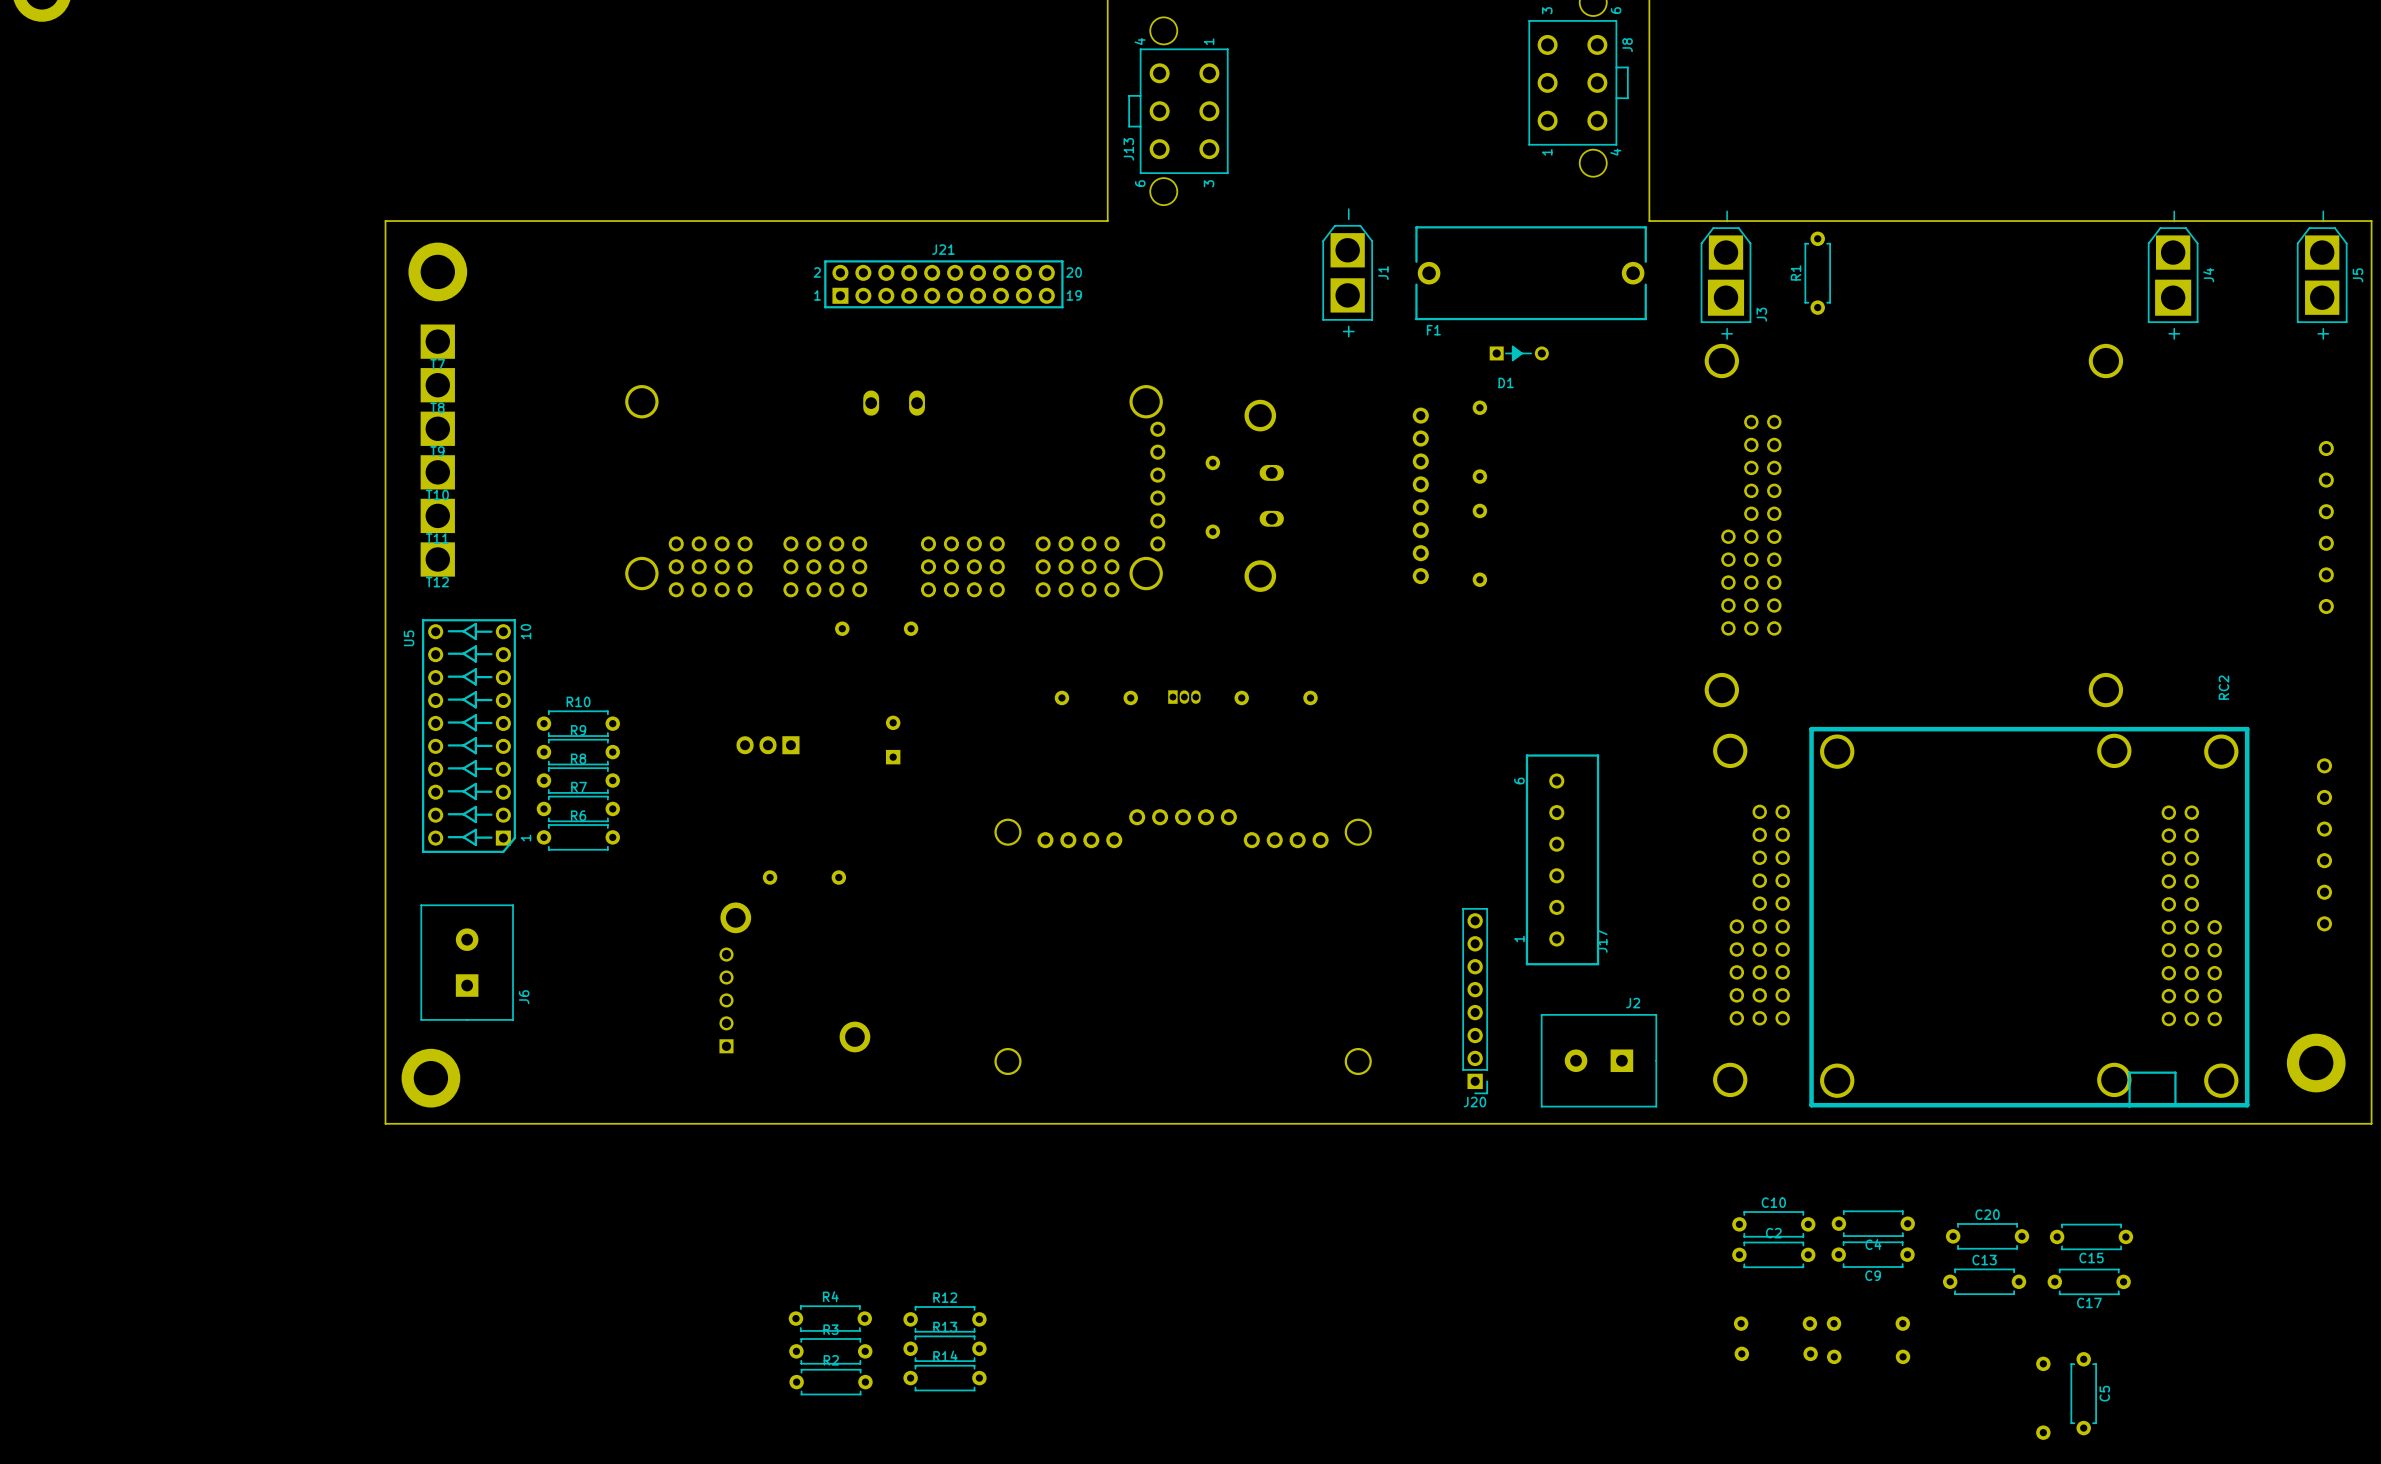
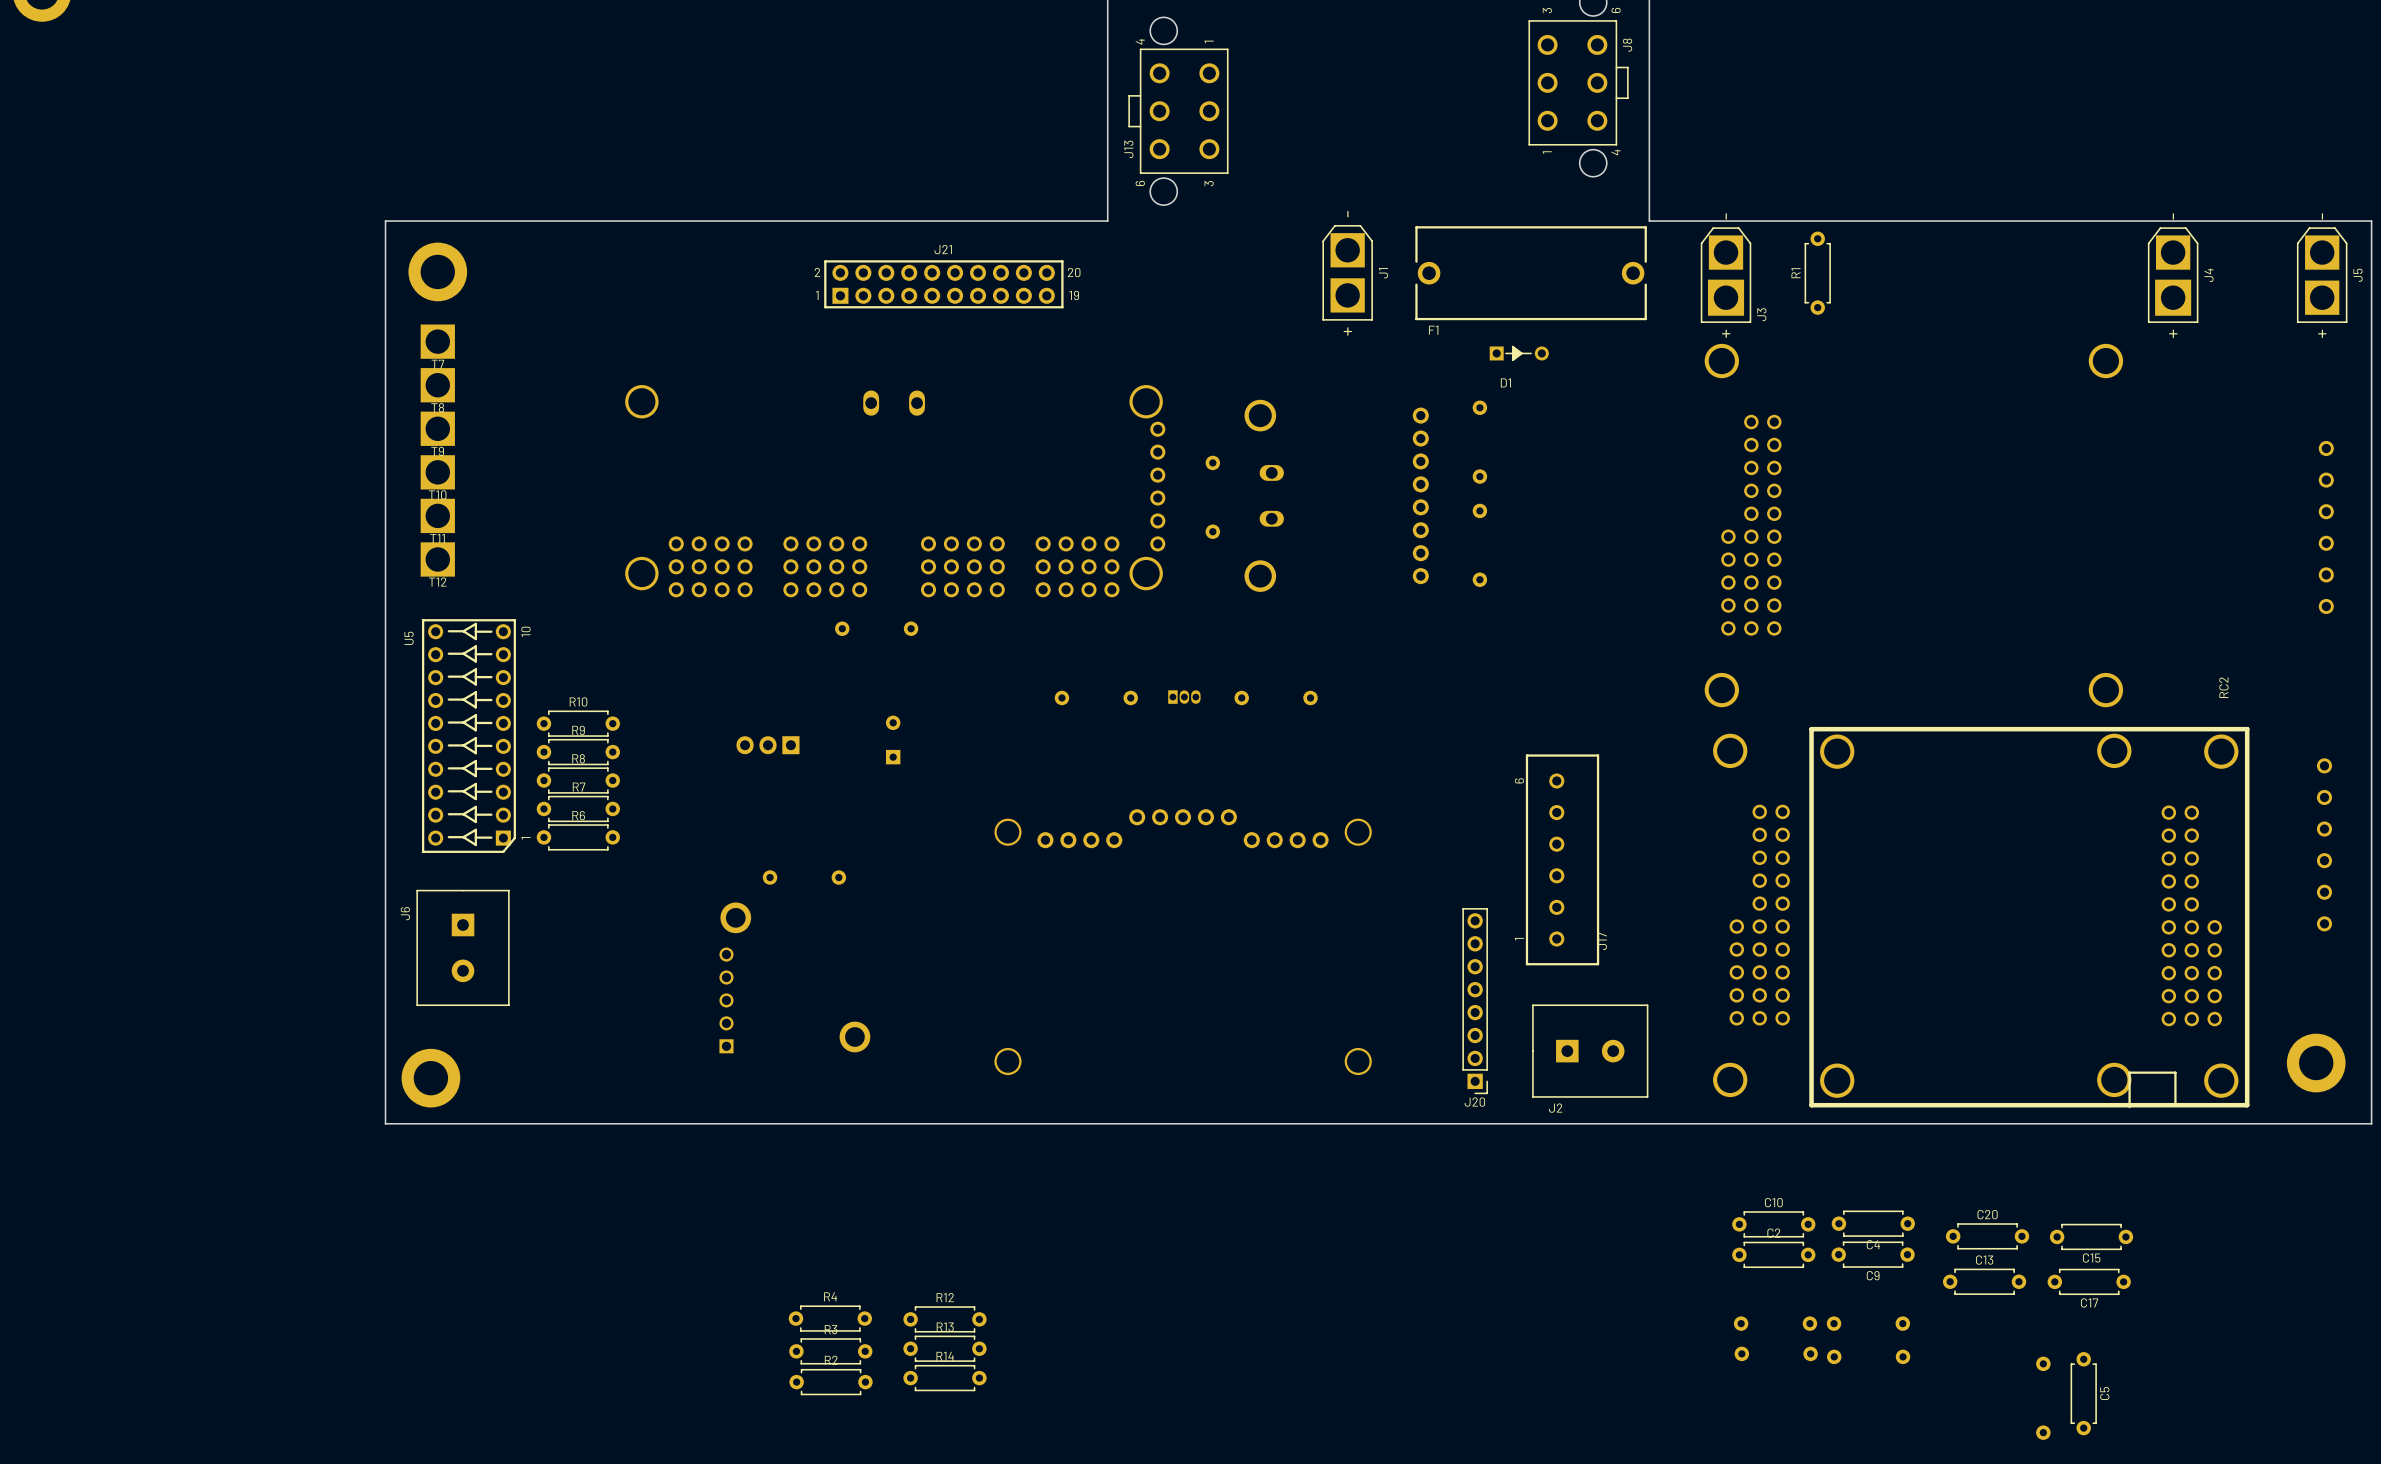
J6 rotation: 0° (467, 962) -> 180° (463, 947)
J2 rotation: 0° (1598, 1060) -> 180° (1590, 1051)

